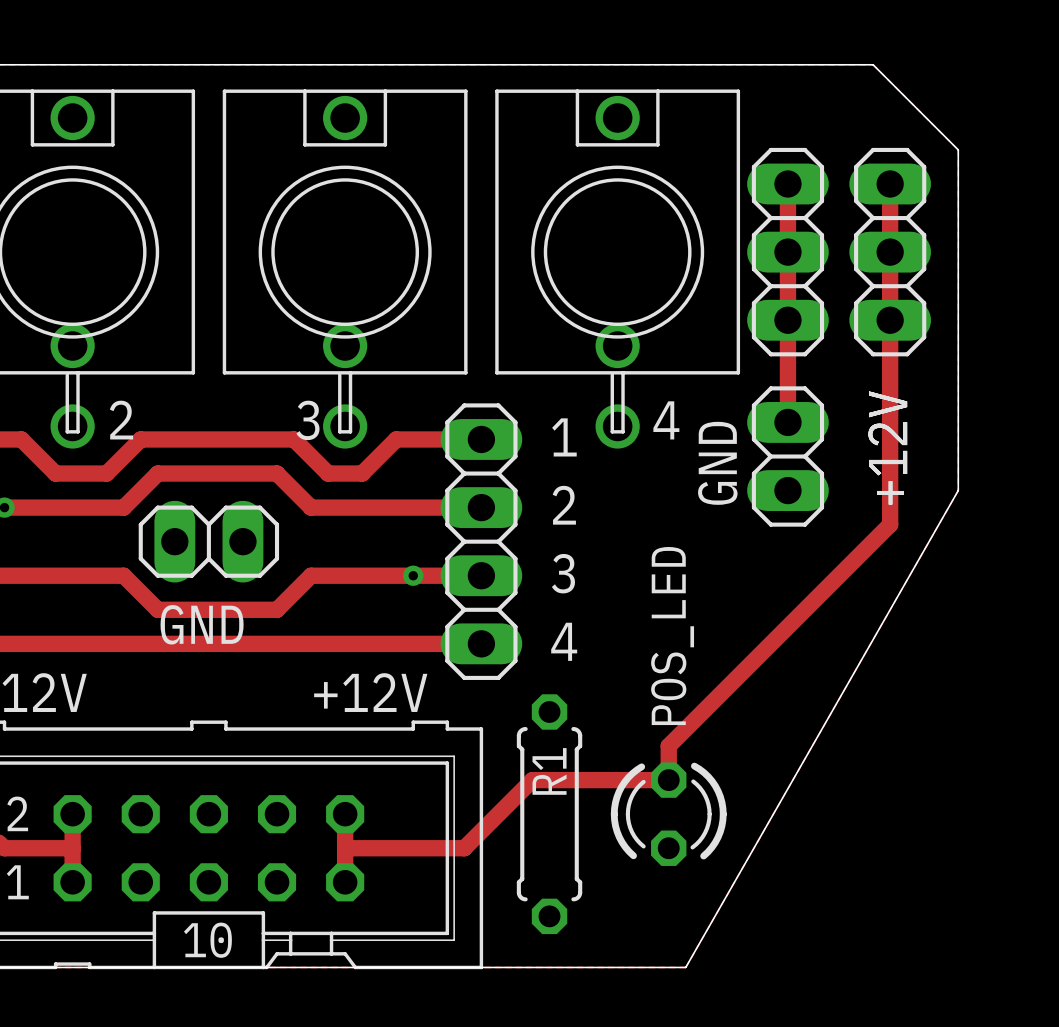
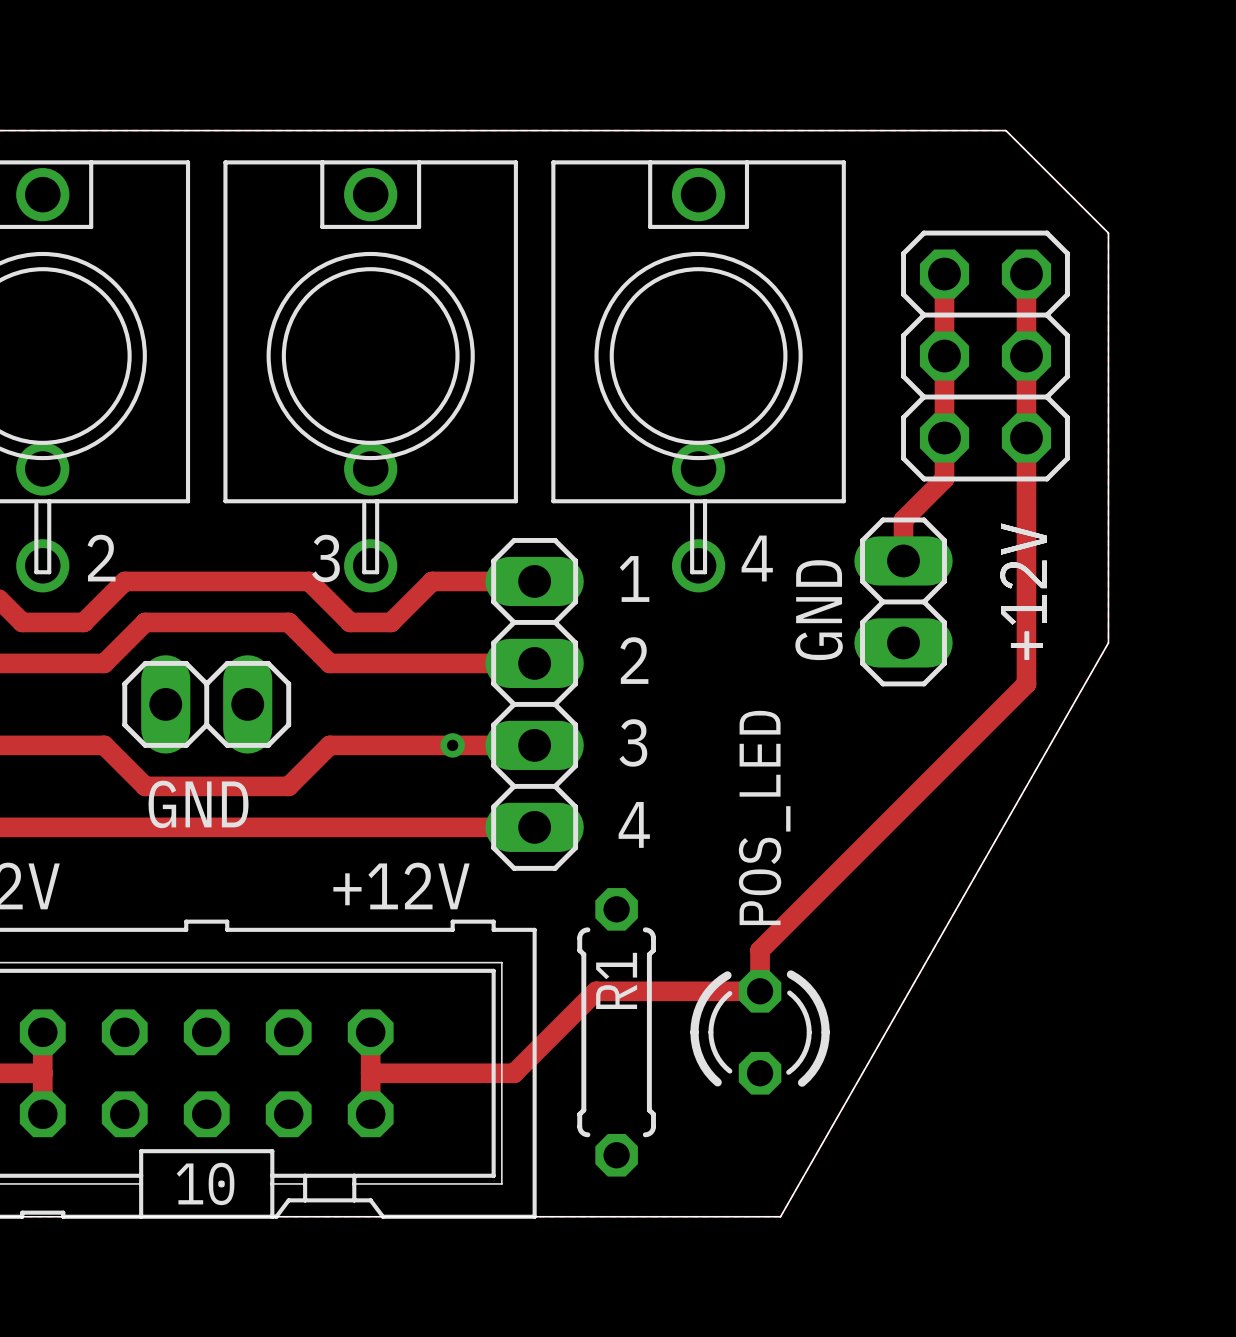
track: (787, 184) (787, 388) -> (944, 274) (944, 478) (903, 519)
part: (787, 252) -> none
part: none -> (985, 356)
part: (890, 252) -> none

